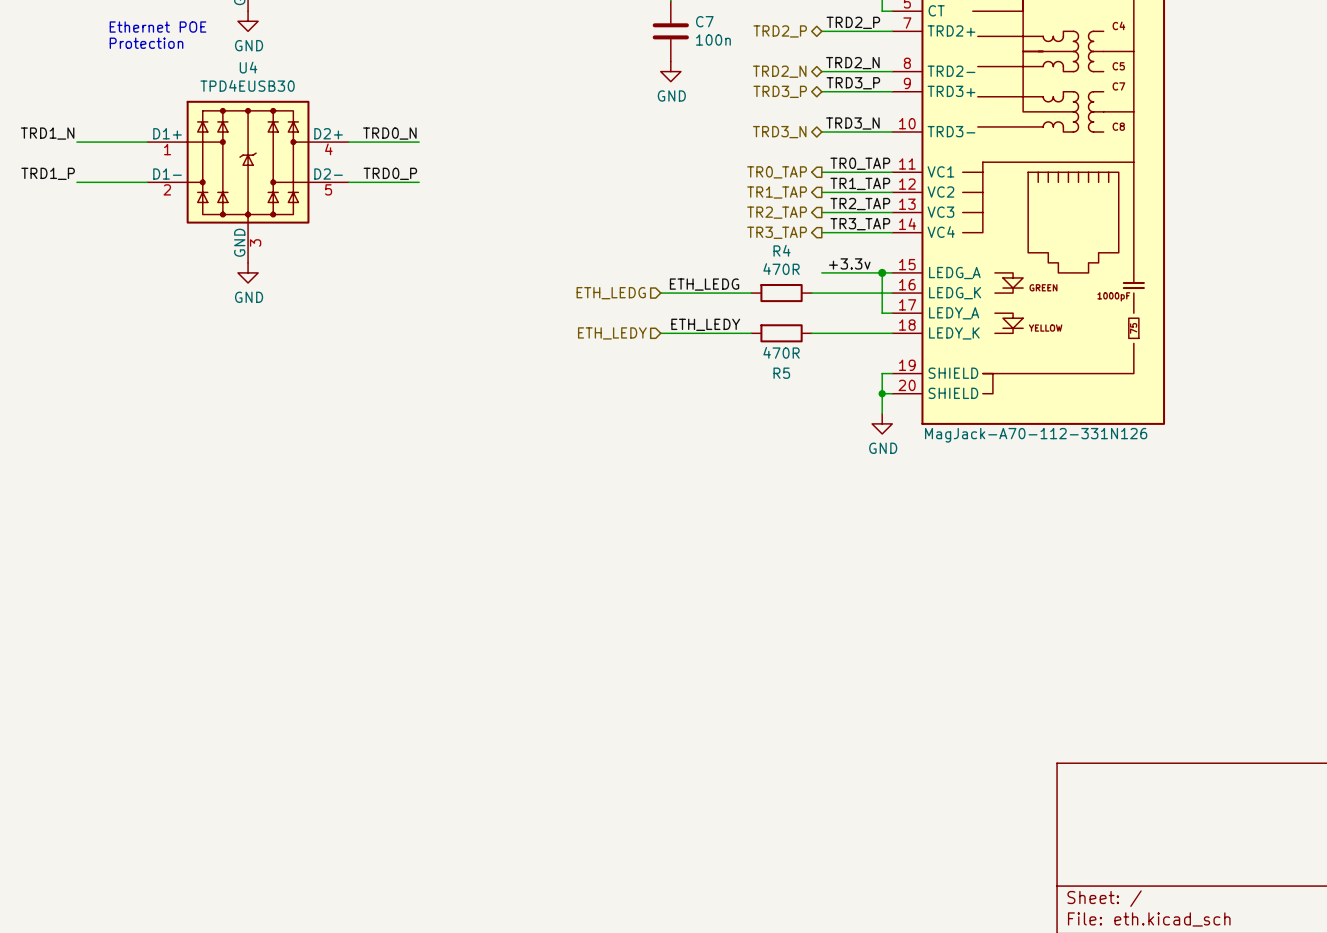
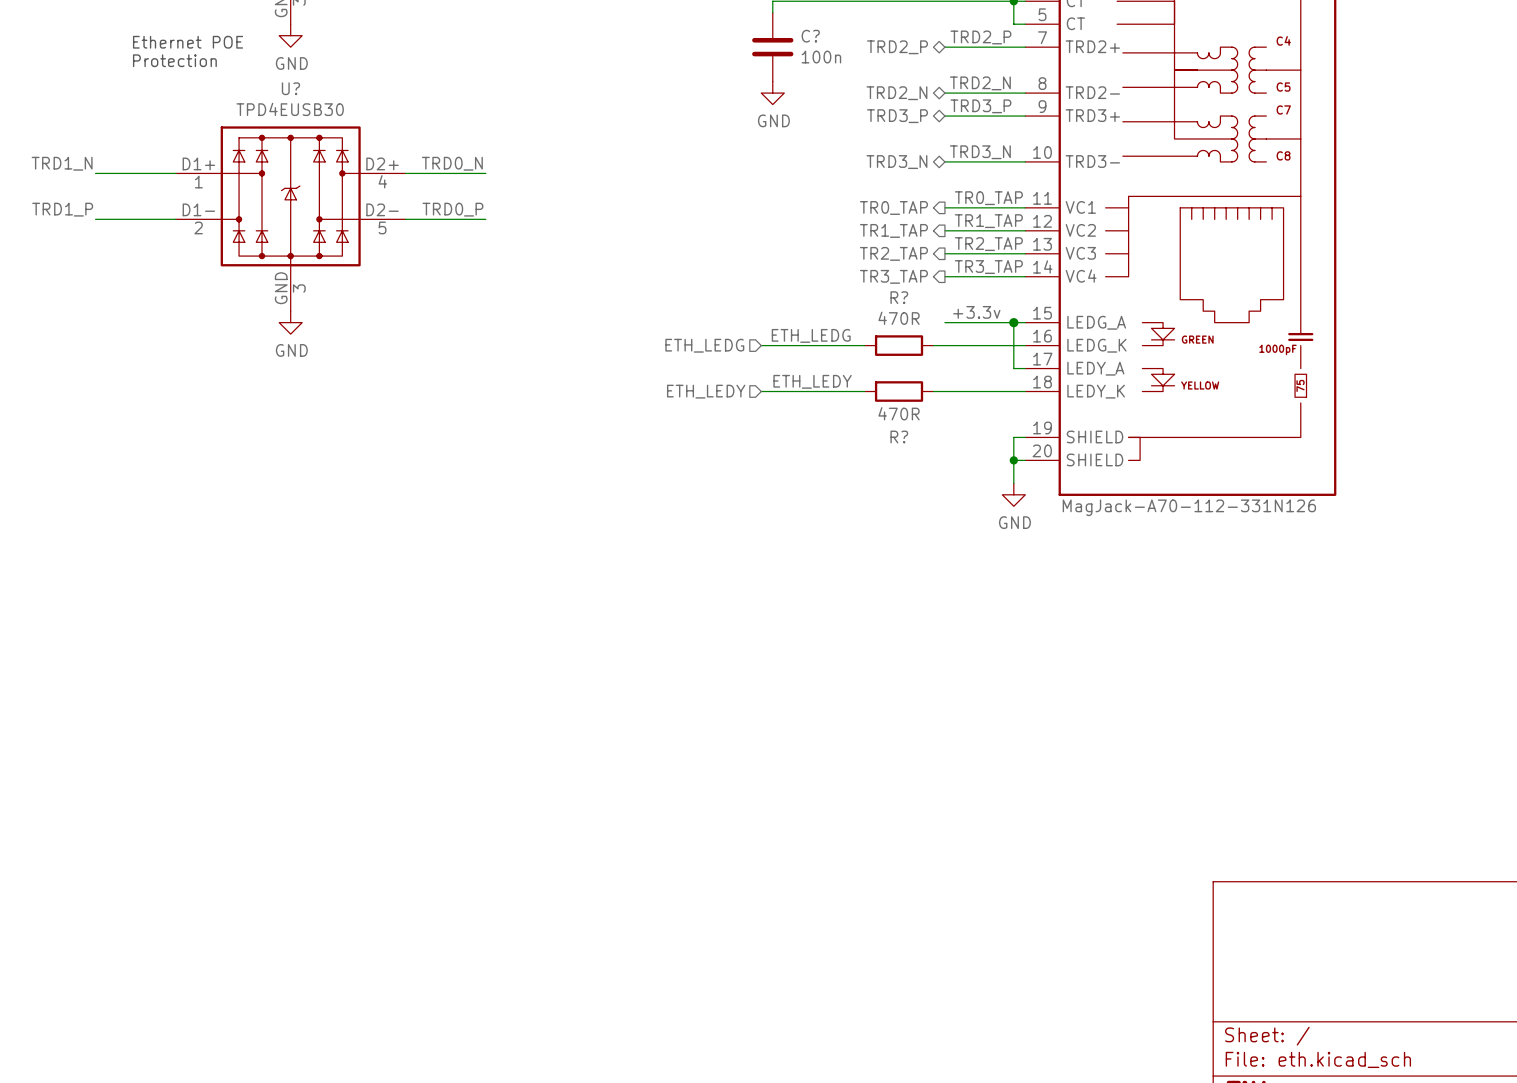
C7 name: C7 (704, 21) -> C? (810, 36)
U4 name: U4 (248, 67) -> U? (290, 88)
R4 name: R4 (782, 250) -> R? (899, 297)
R5 name: R5 (781, 373) -> R? (899, 436)

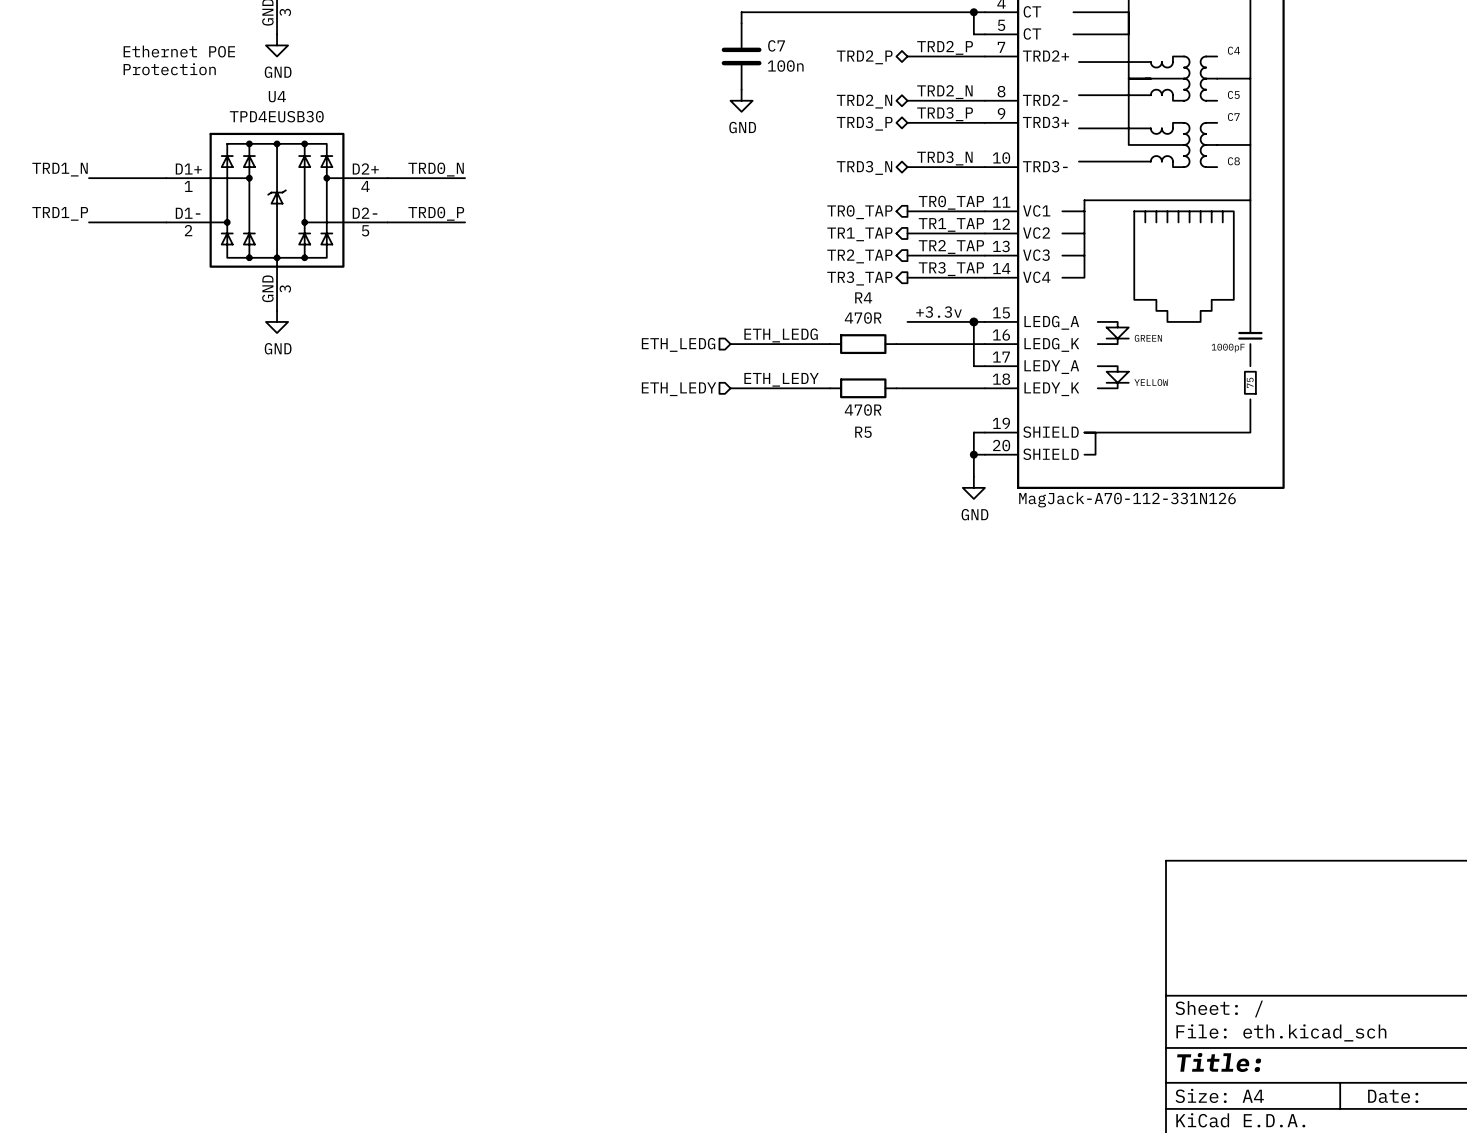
C? name: C? (810, 36) -> C7 (776, 45)
U? name: U? (290, 88) -> U4 (277, 96)
R? name: R? (899, 297) -> R4 (863, 297)
R? name: R? (899, 436) -> R5 (863, 432)

